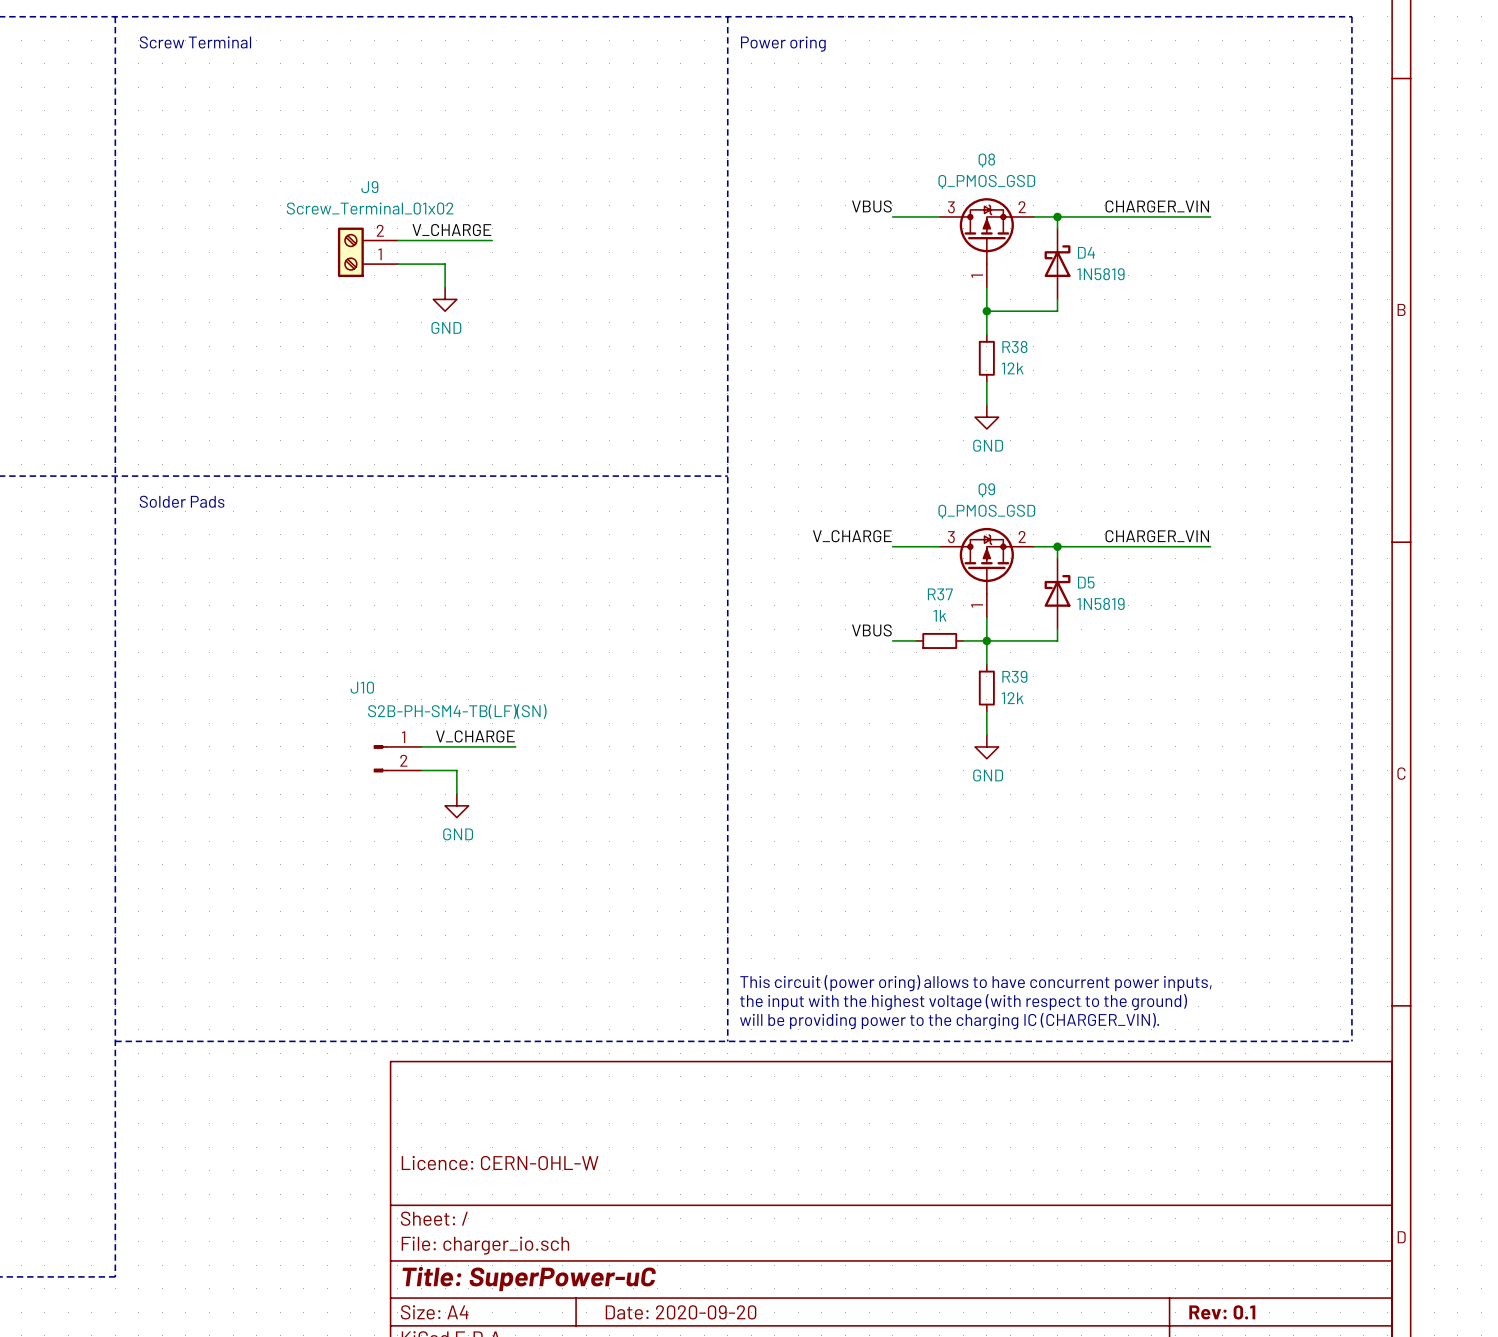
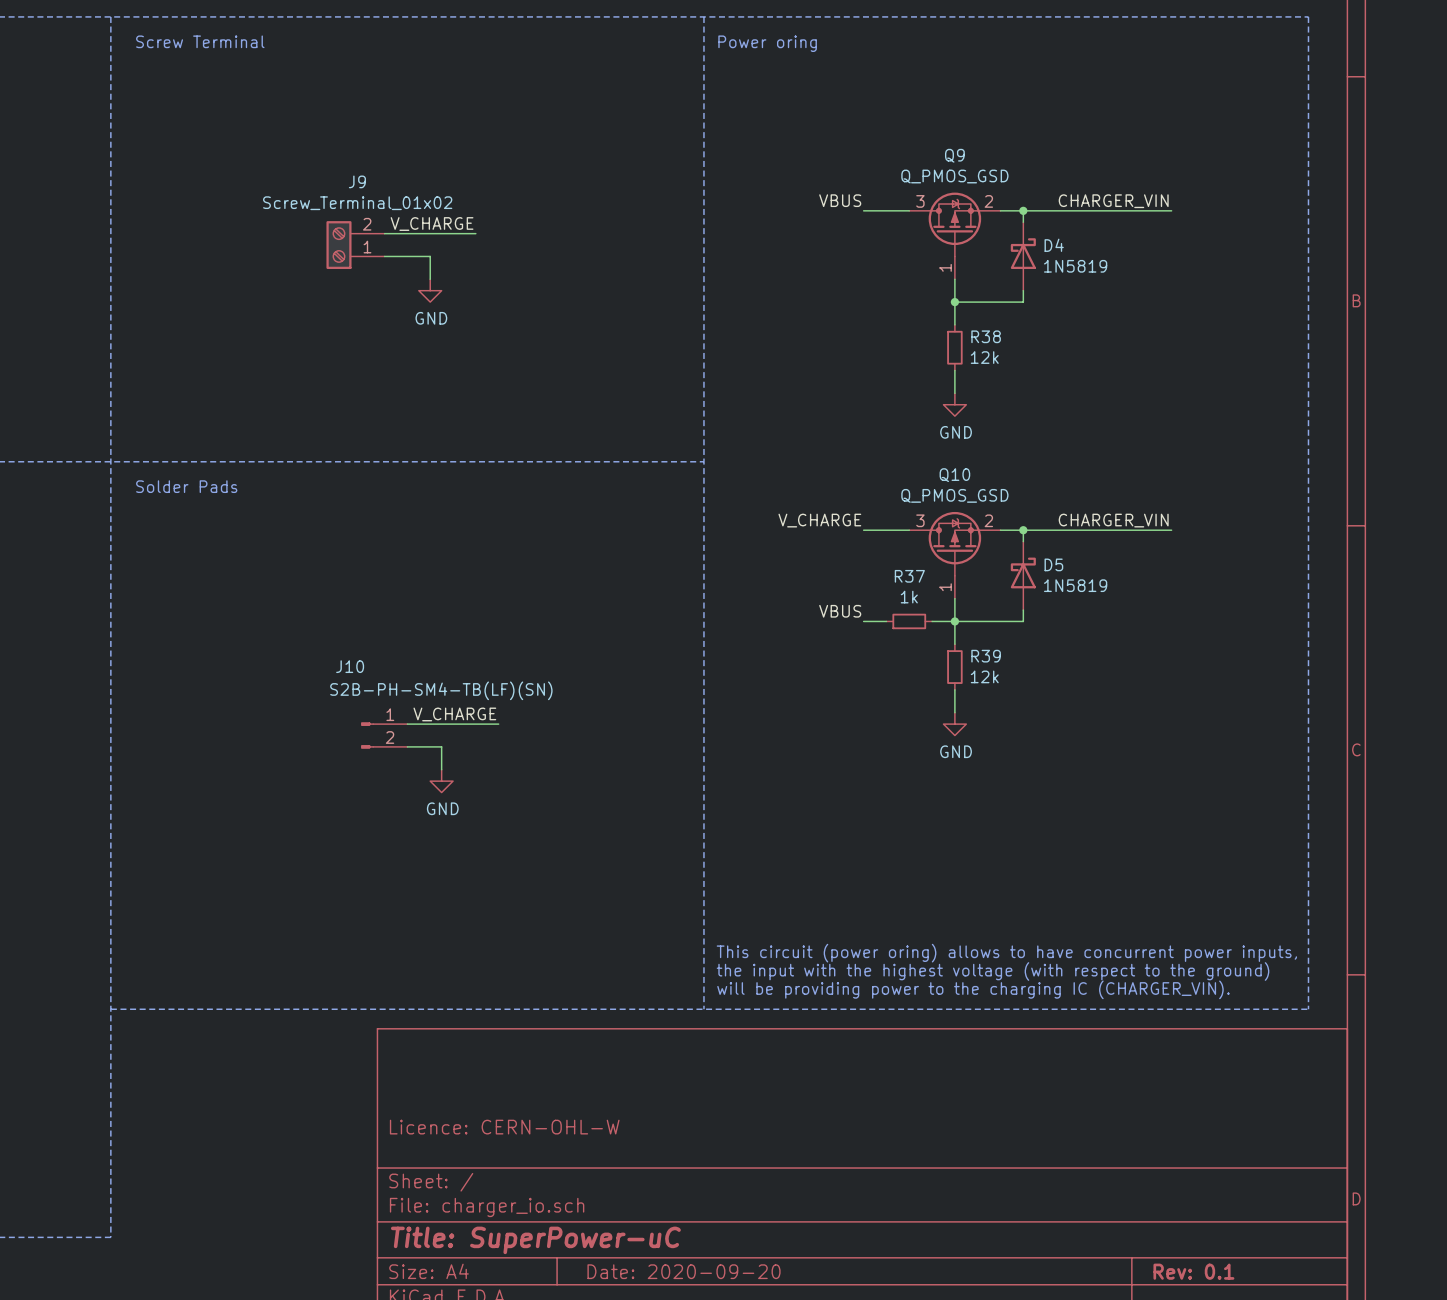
Q8 name: Q8 (986, 160) -> Q9 (954, 155)
Q9 name: Q9 (986, 490) -> Q10 (954, 475)

